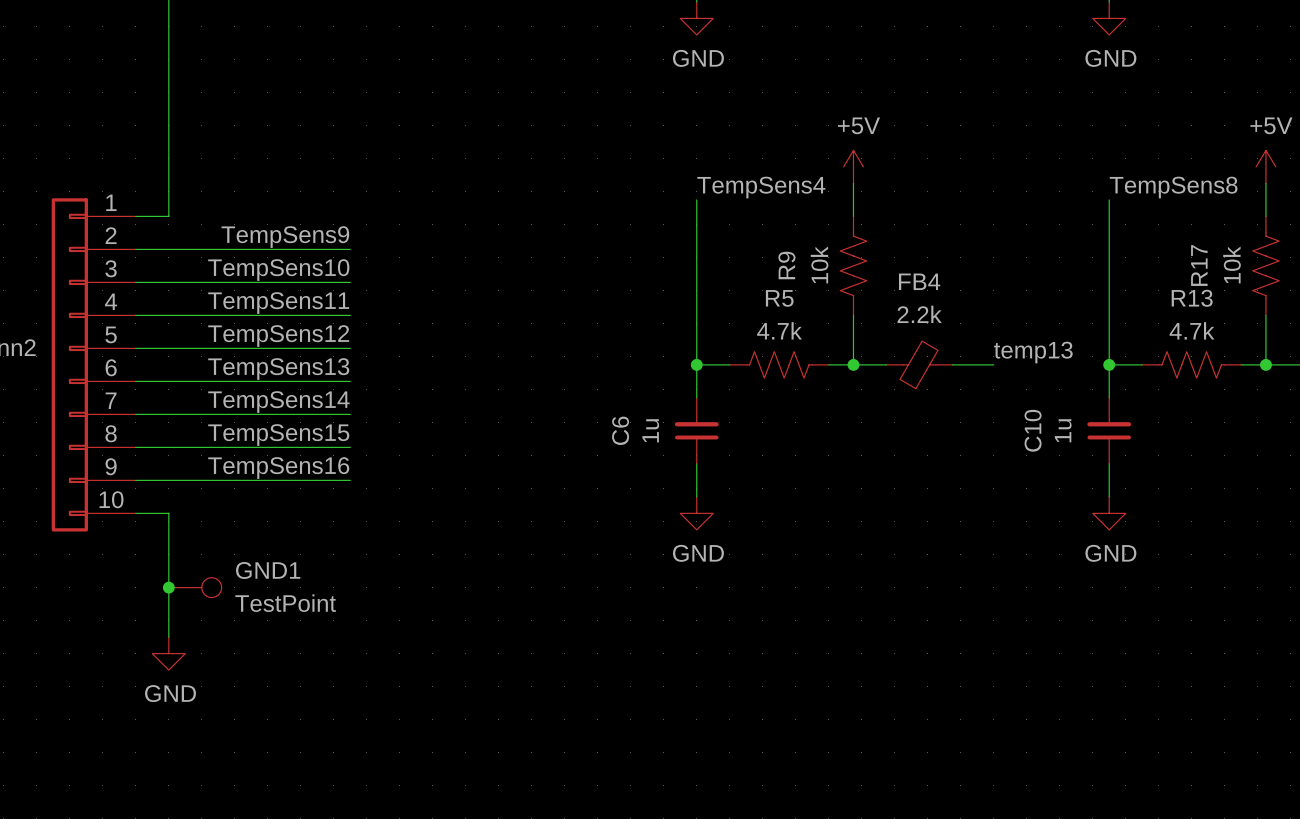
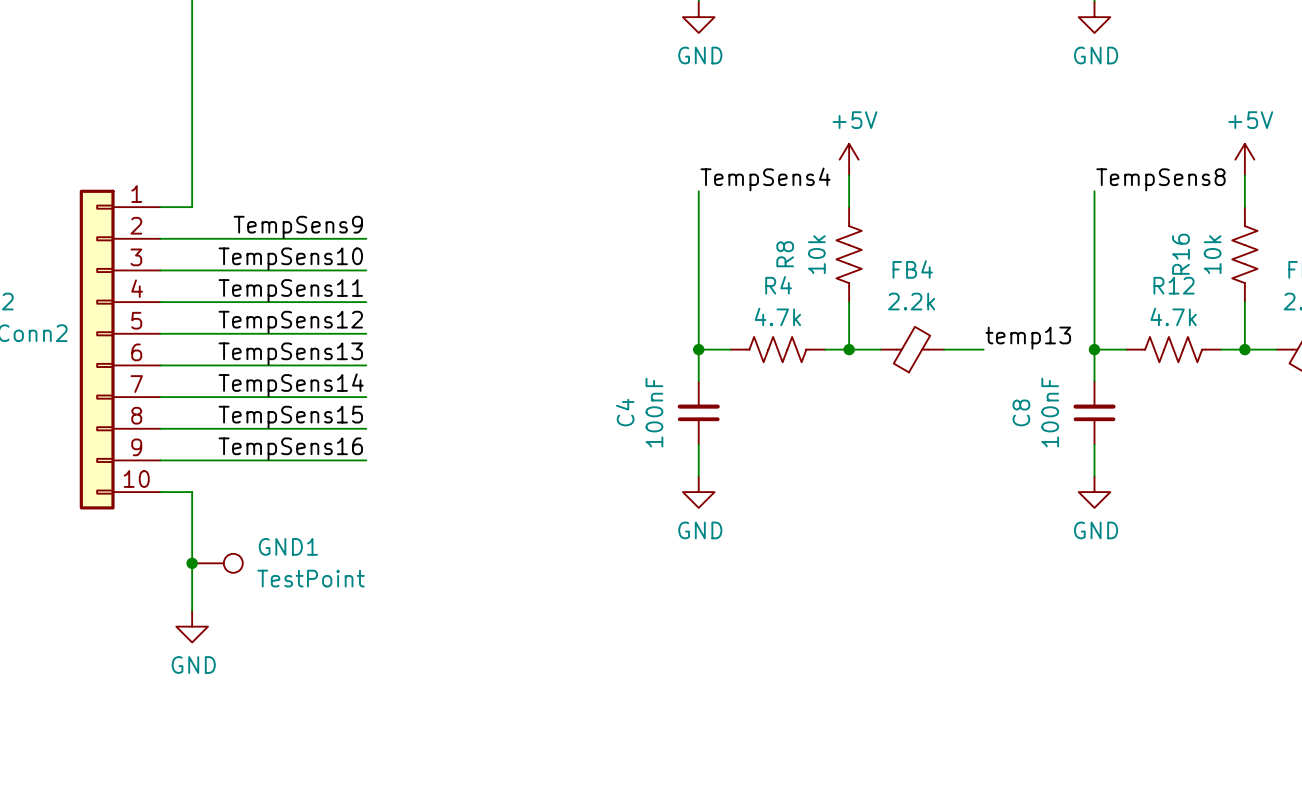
R9 name: R9 (786, 265) -> R8 (785, 254)
R17 name: R17 (1199, 265) -> R16 (1180, 254)
R5 name: R5 (779, 298) -> R4 (778, 285)
R13 name: R13 (1192, 298) -> R12 (1174, 285)
C6 name: C6 (620, 430) -> C4 (625, 412)
C6 value: 1u (650, 430) -> 100nF (654, 412)
C10 name: C10 (1033, 430) -> C8 (1021, 412)
C10 value: 1u (1063, 430) -> 100nF (1050, 412)

